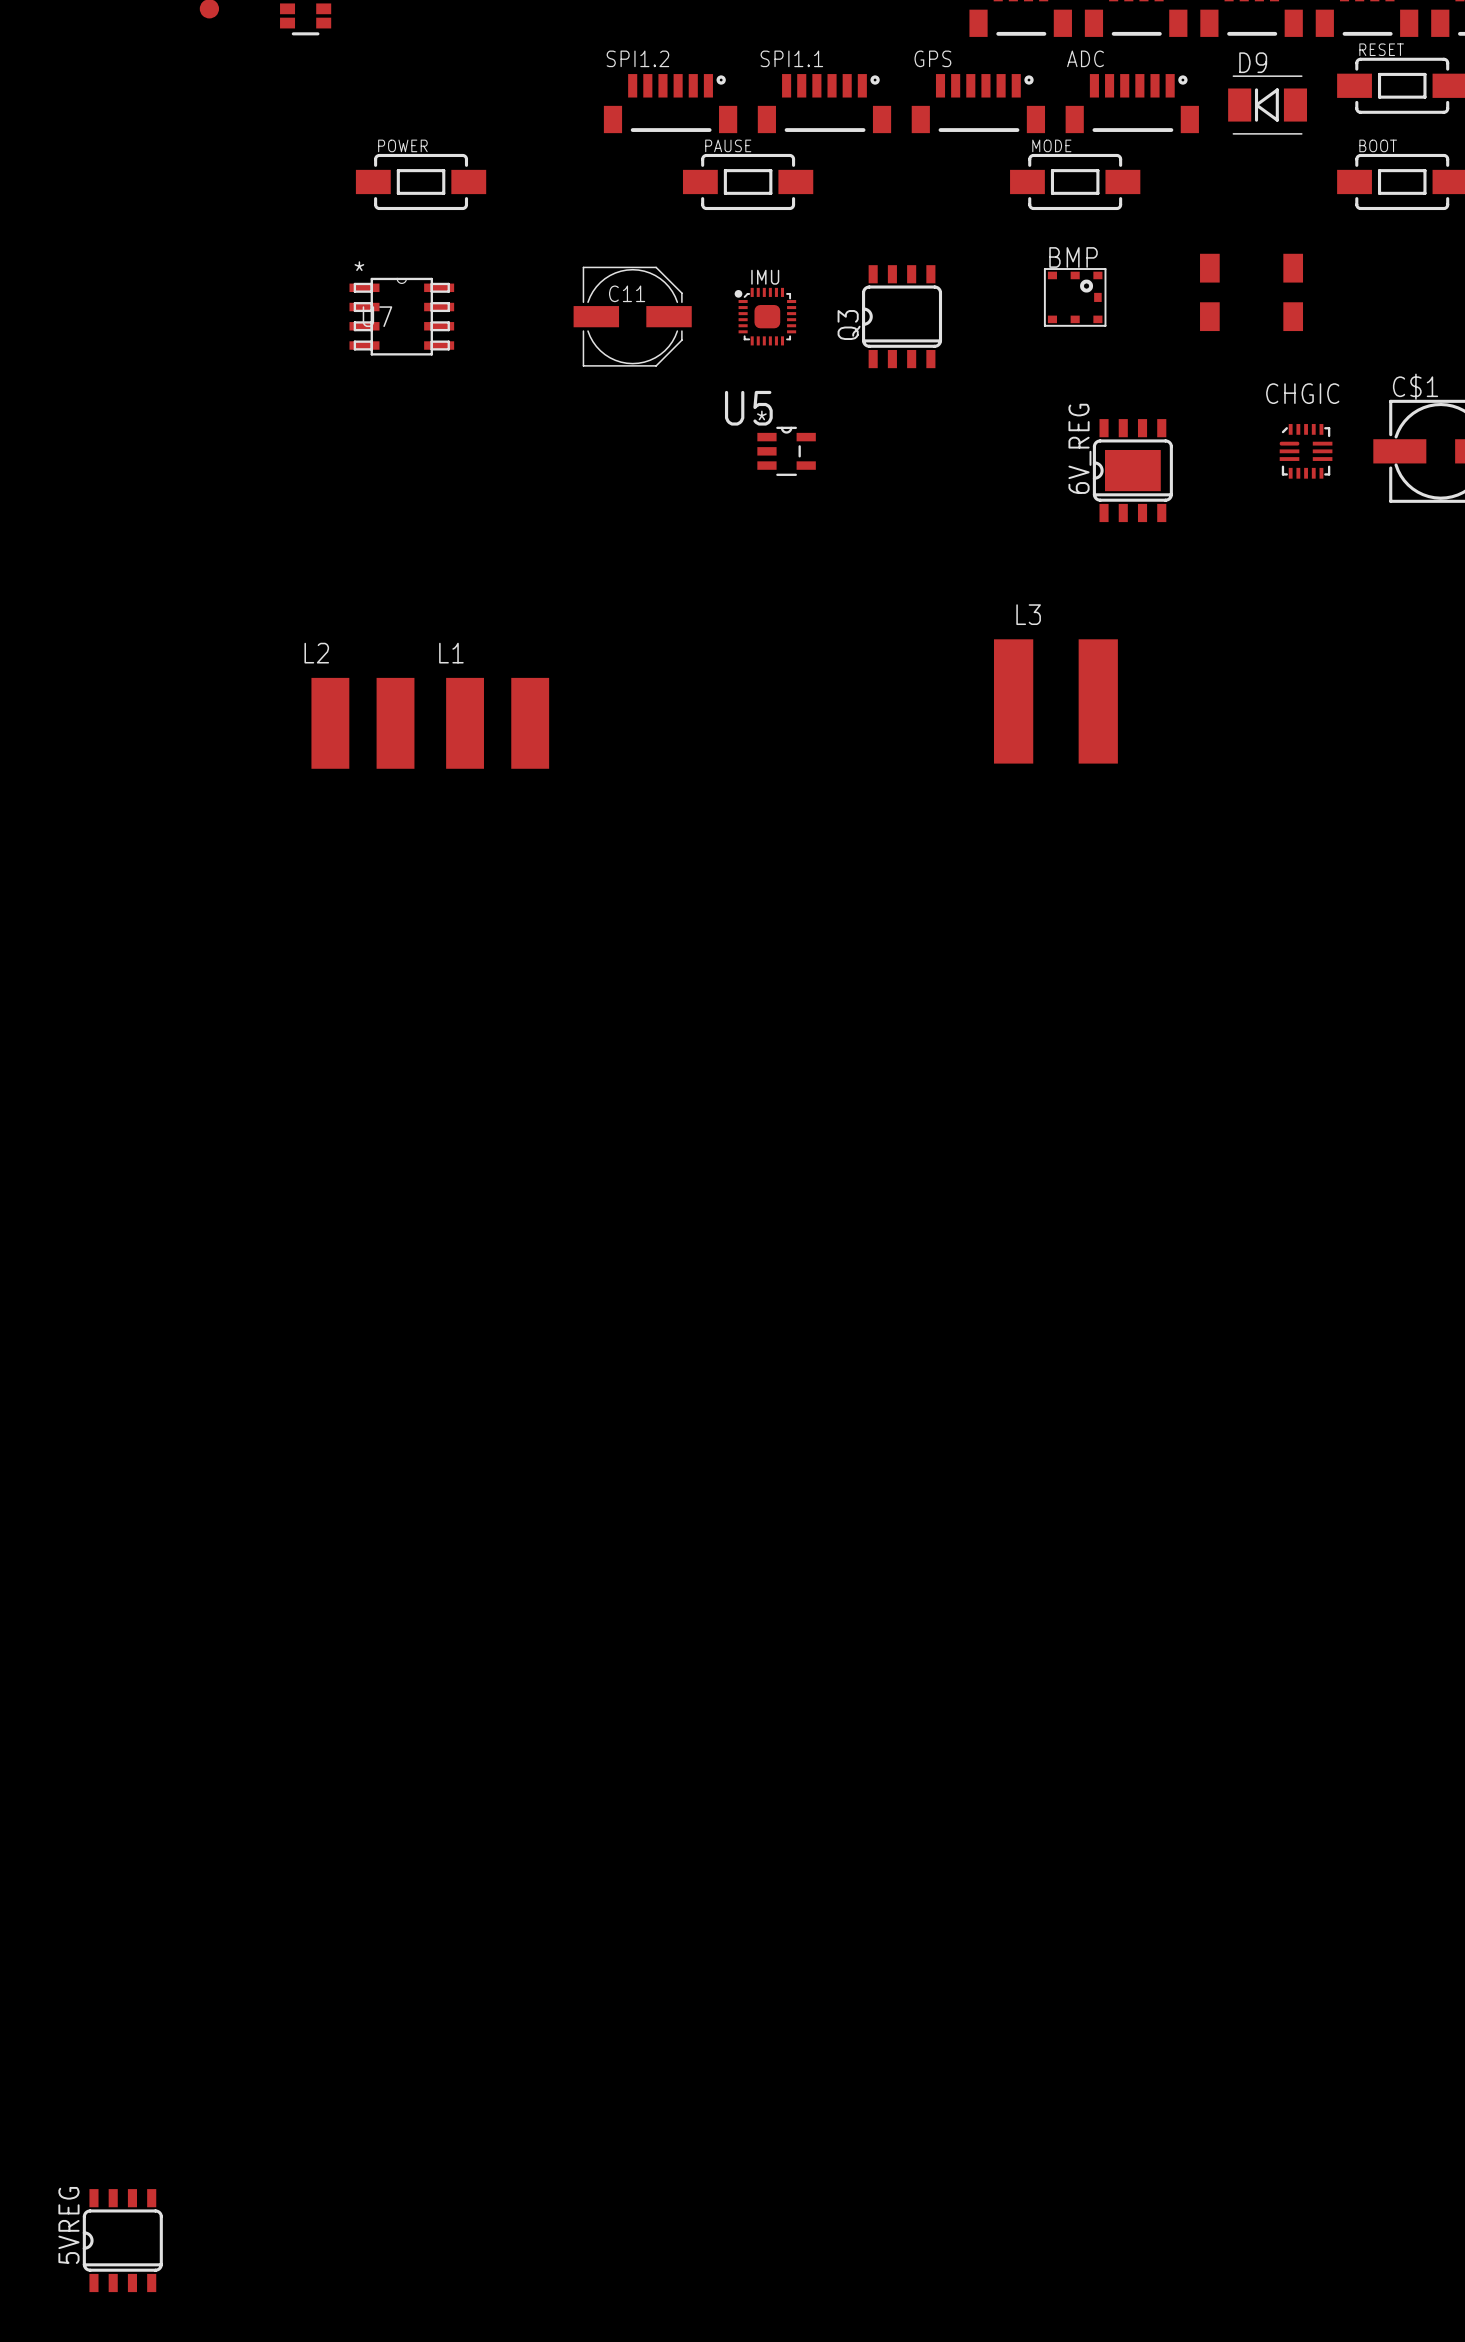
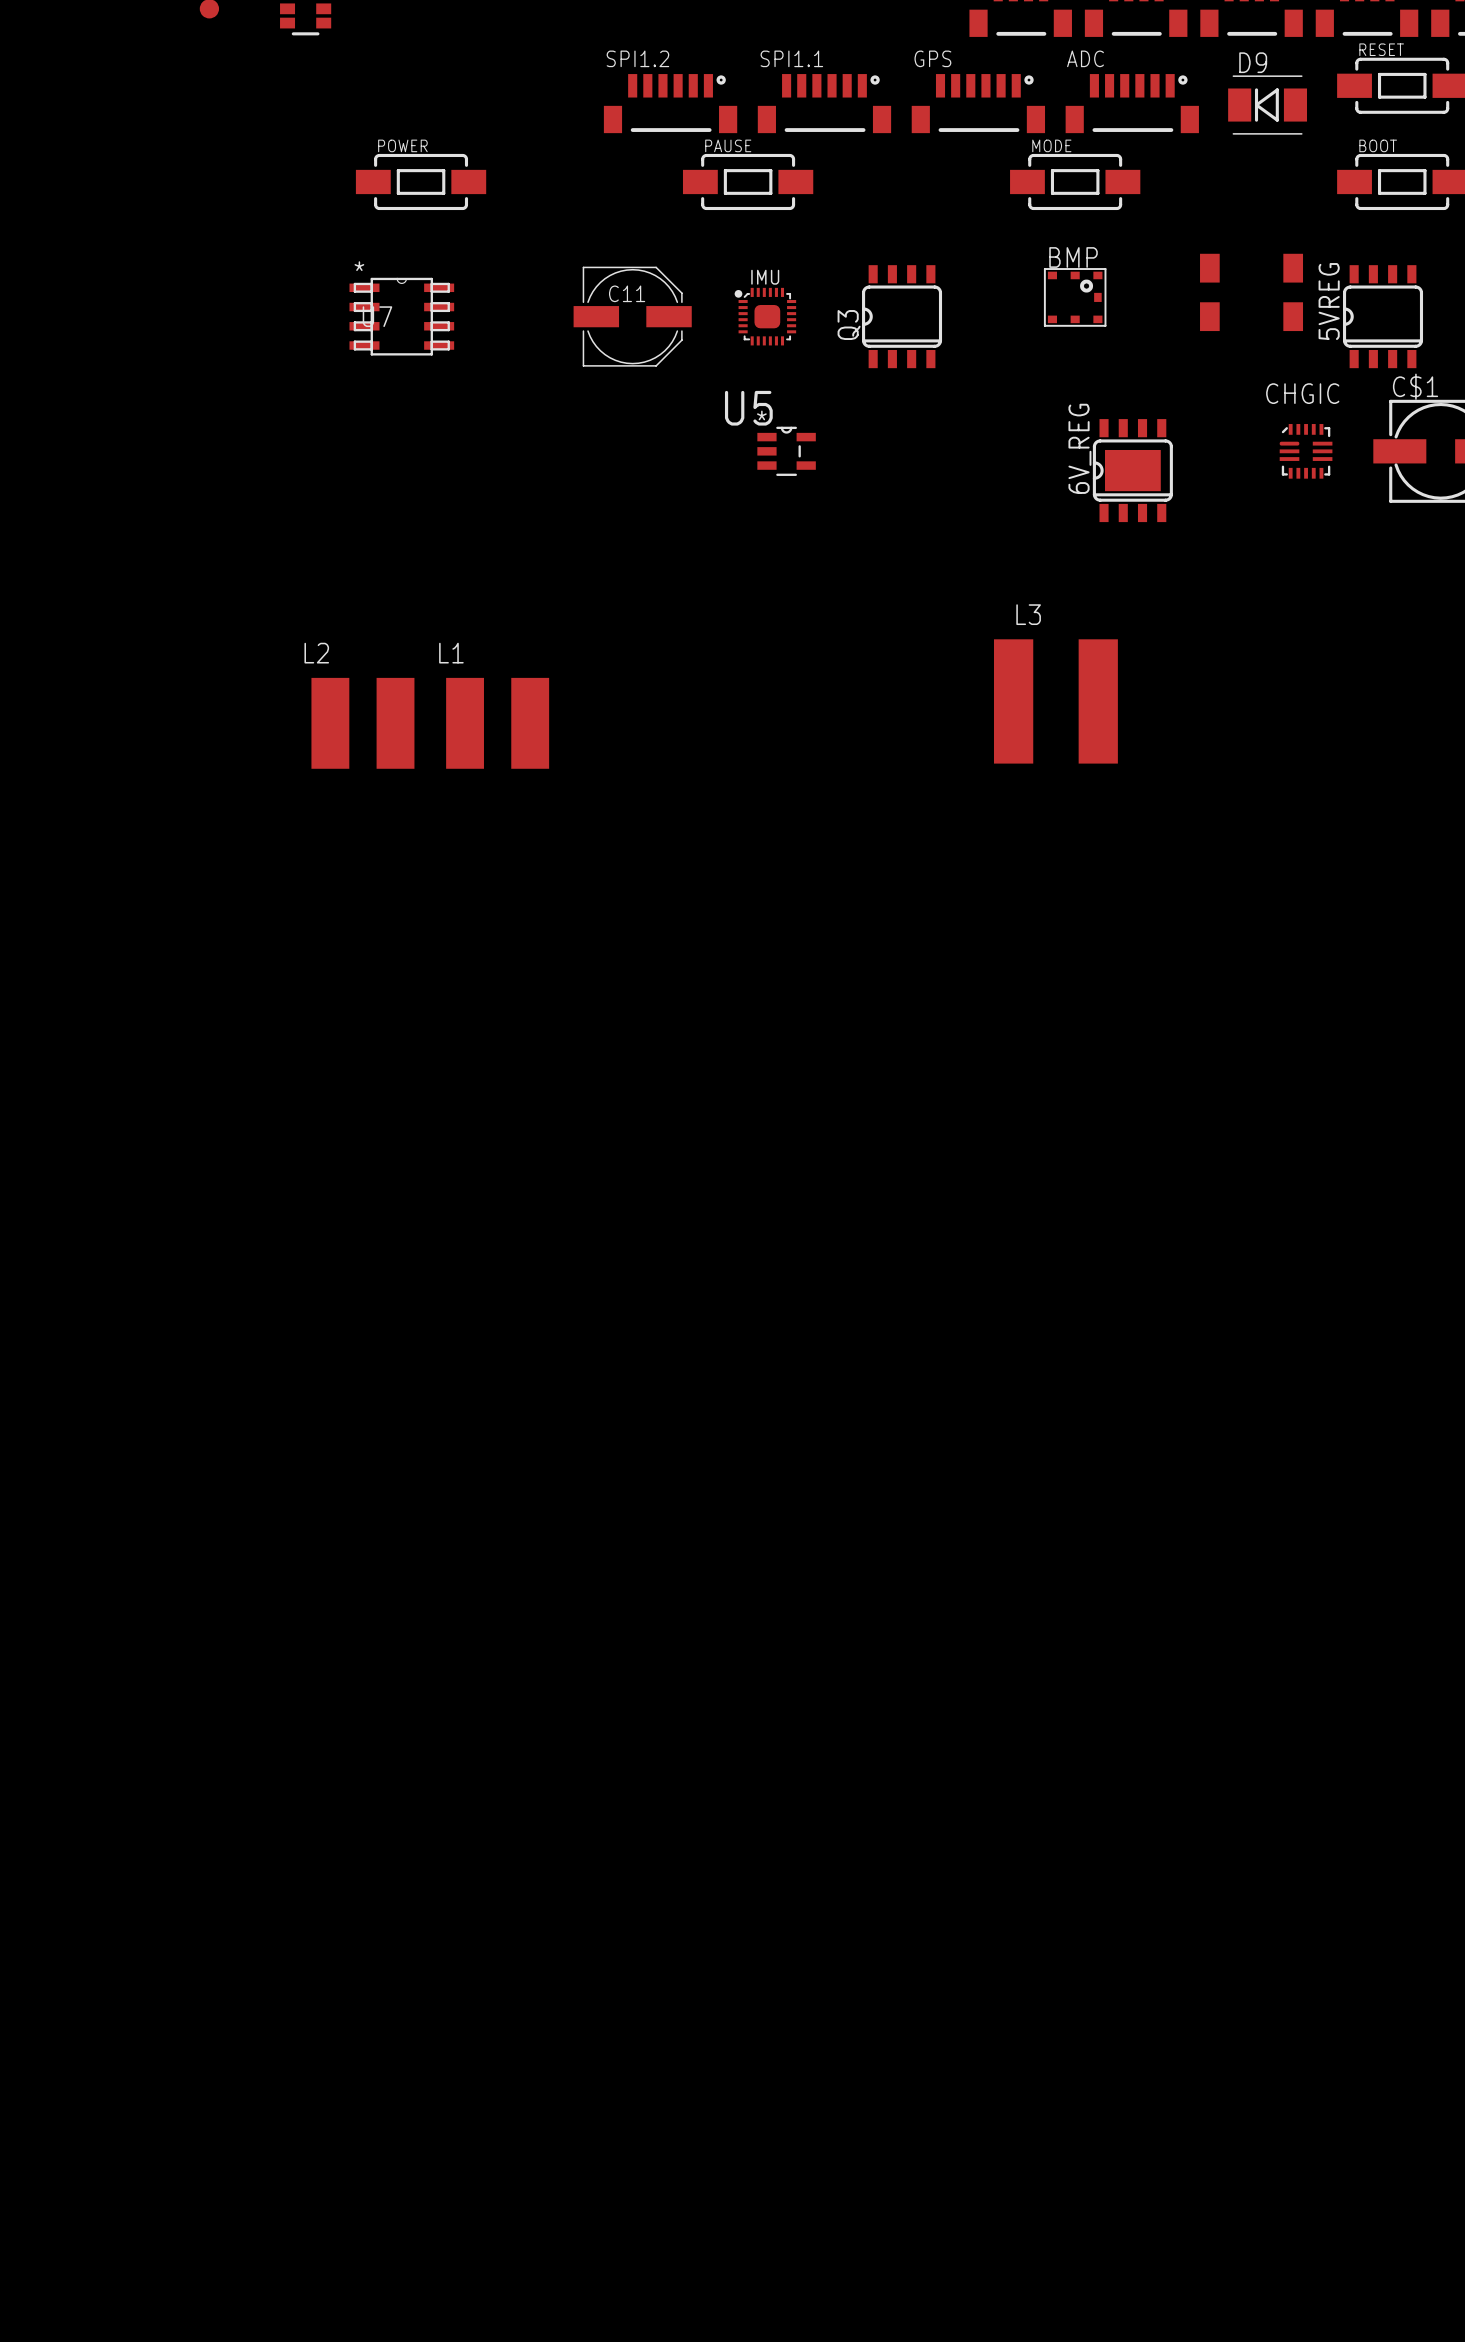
5VREG position: (122, 2240) -> (1383, 316)

